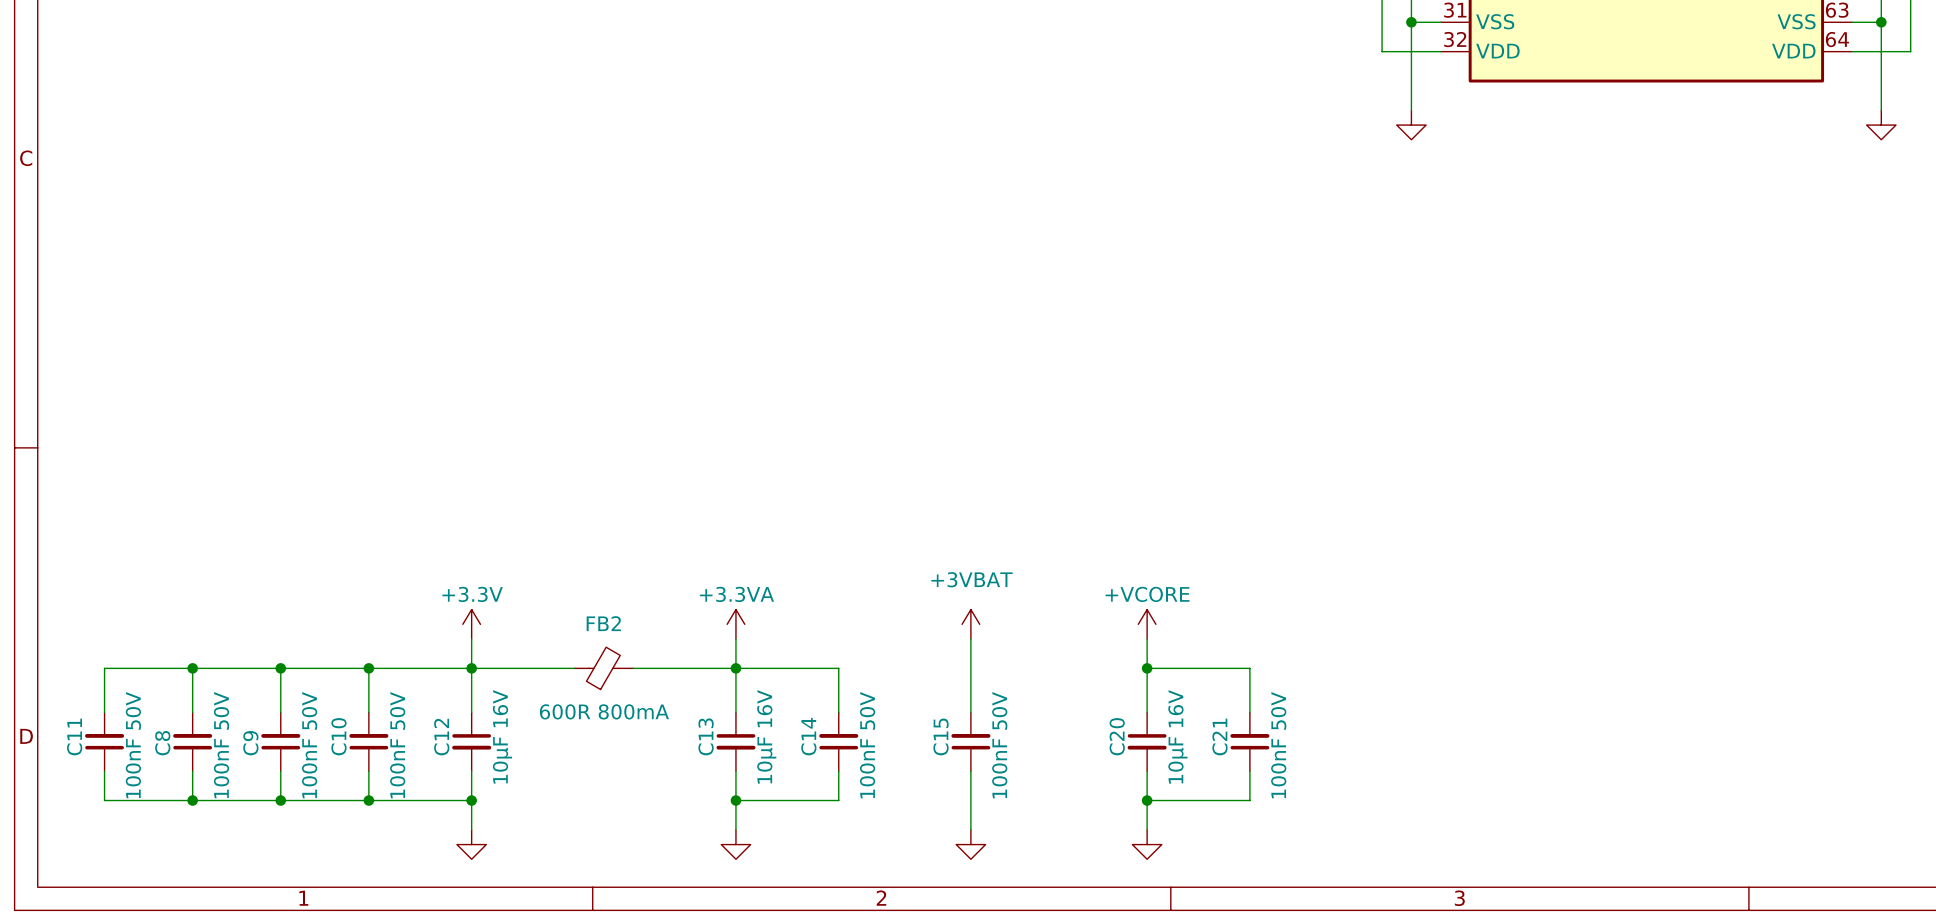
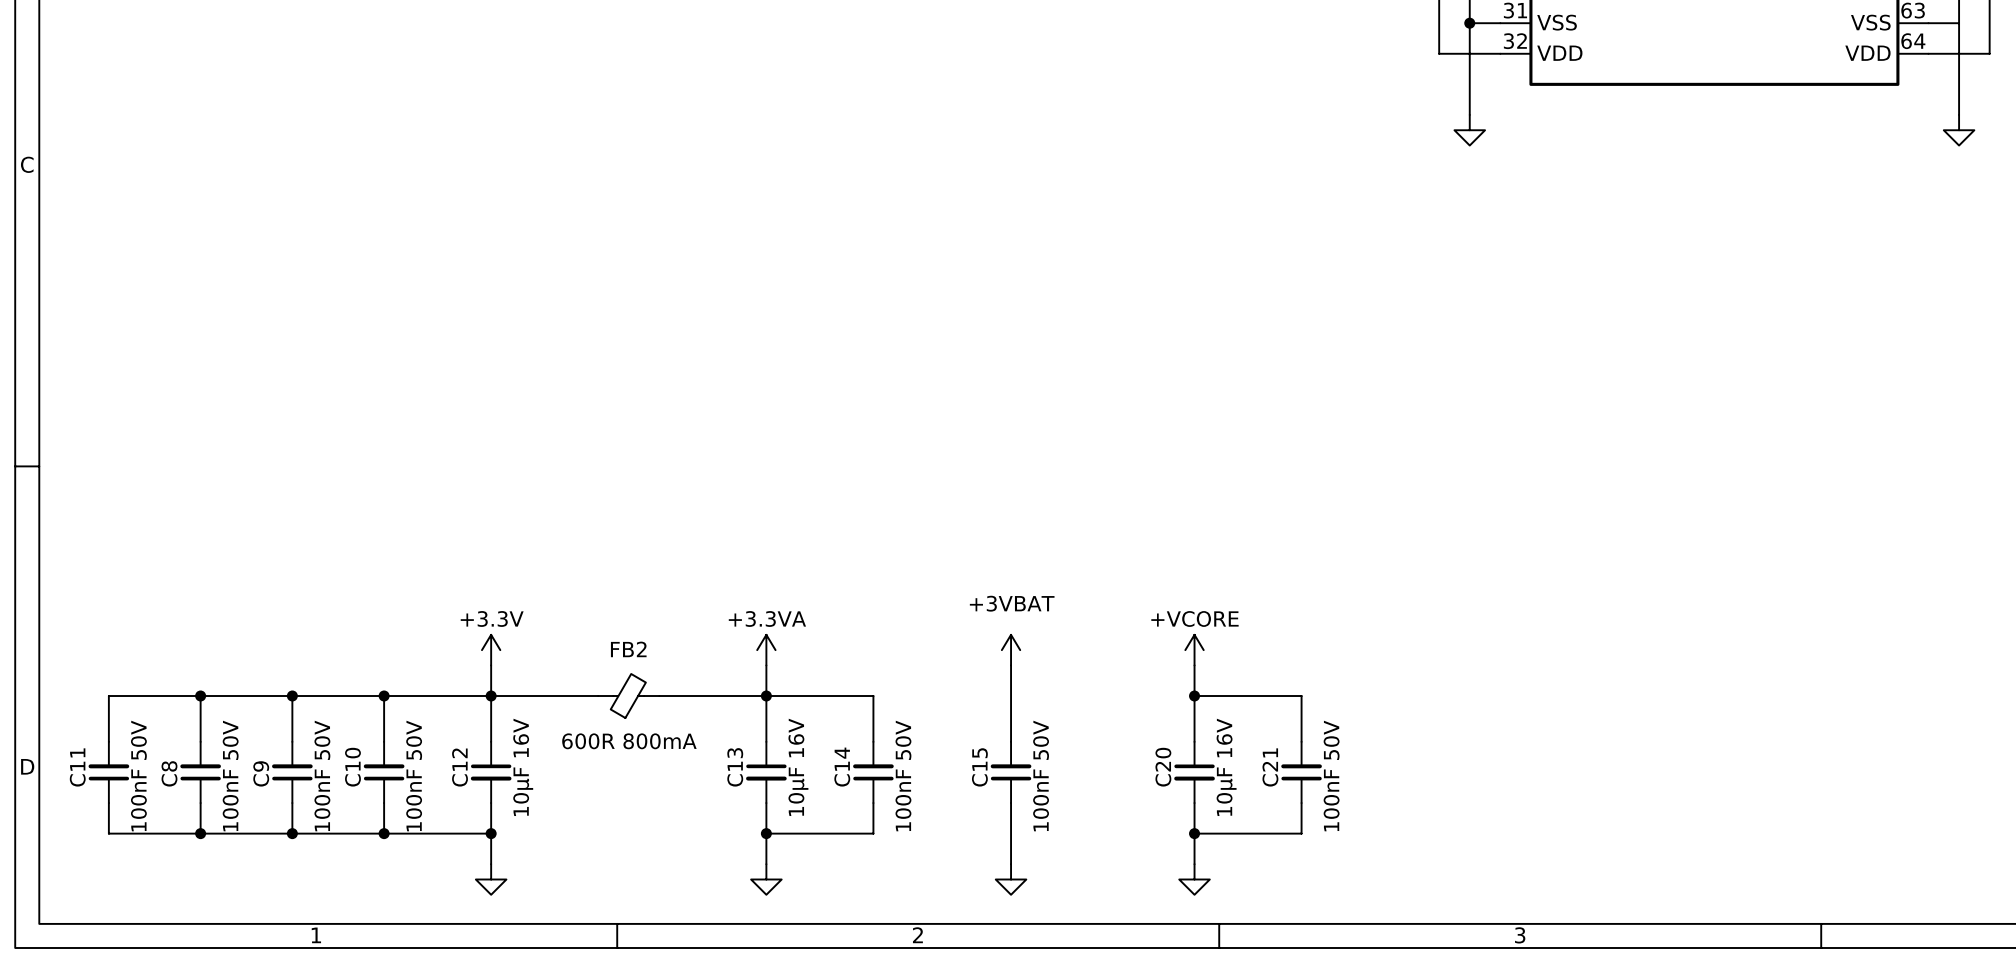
junction: (1881, 22) -> none

